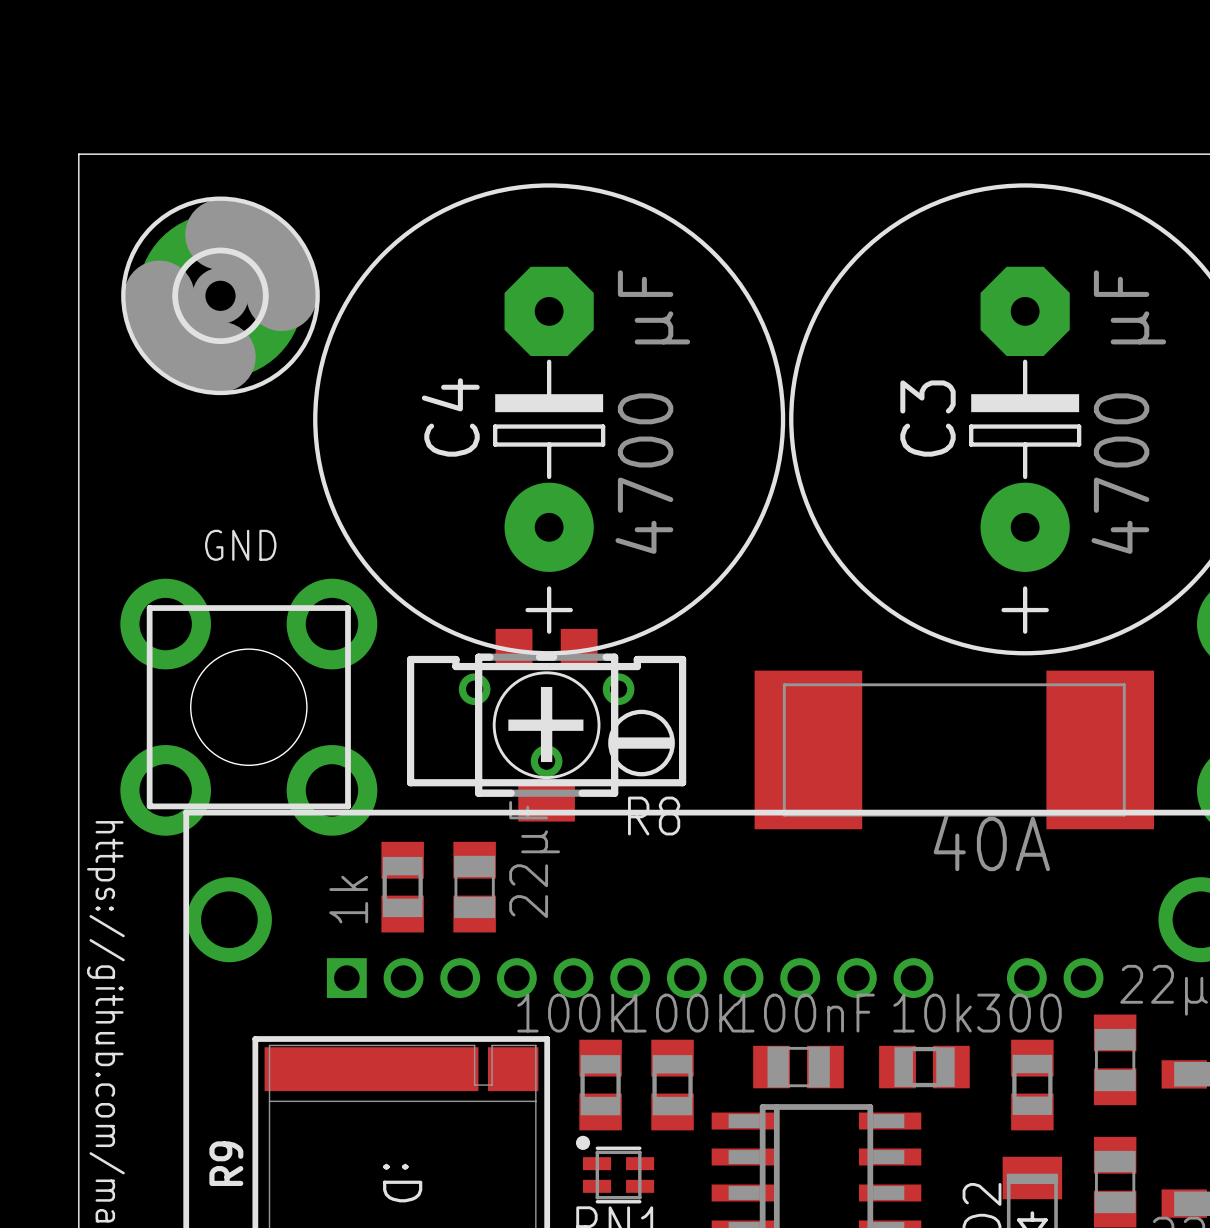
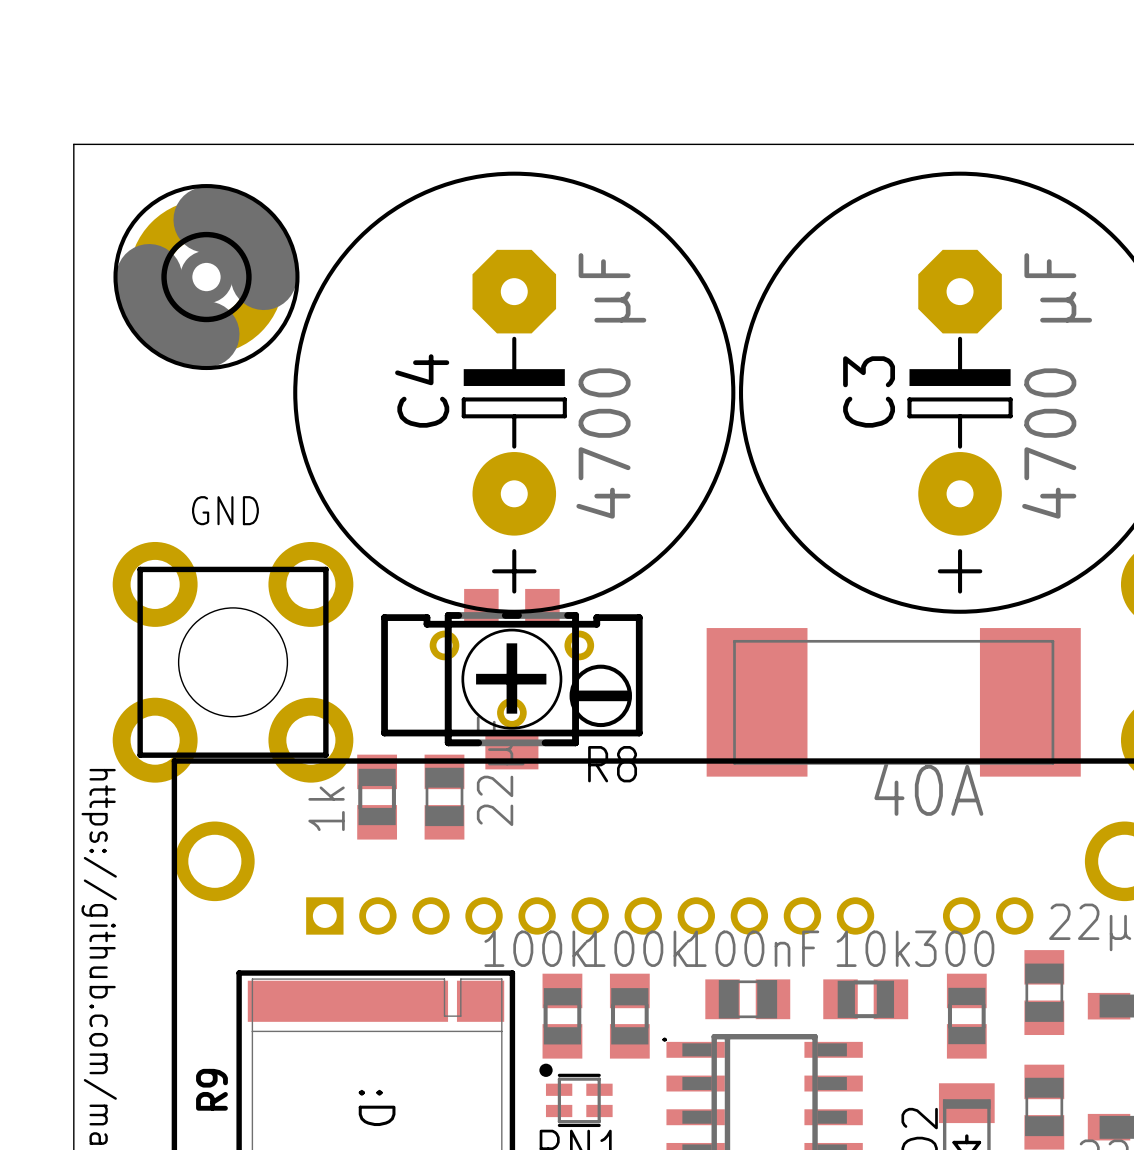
part position: (402, 887) -> (377, 797)
part position: (474, 887) -> (444, 797)
text: none -> . (664, 1039)

